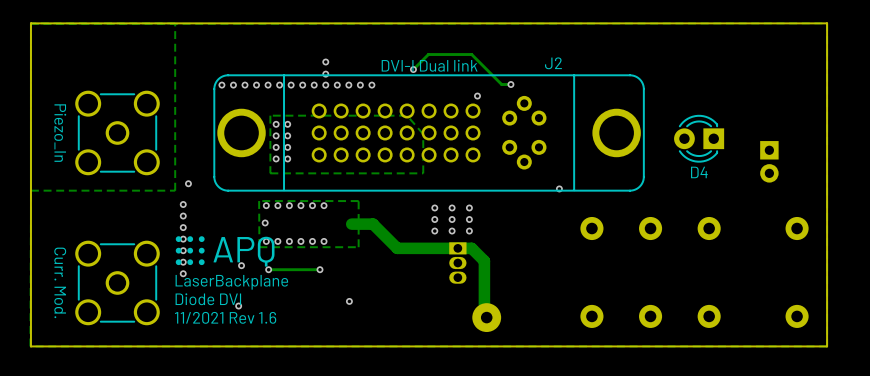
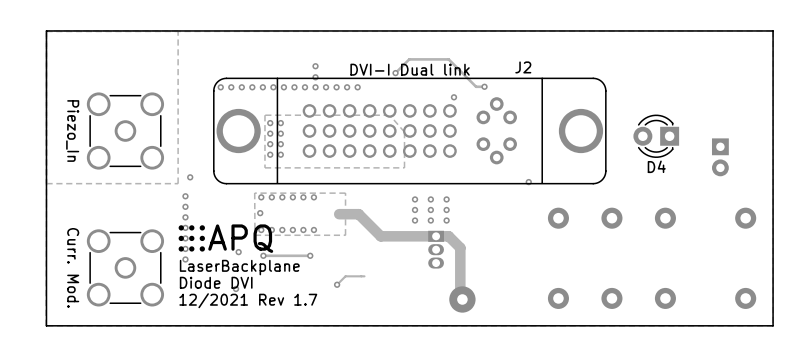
track: none -> (364, 276) (345, 276) (337, 284)
text: 11/2021 Rev 1.6 (225, 317) -> 12/2021 Rev 1.7 (248, 300)

